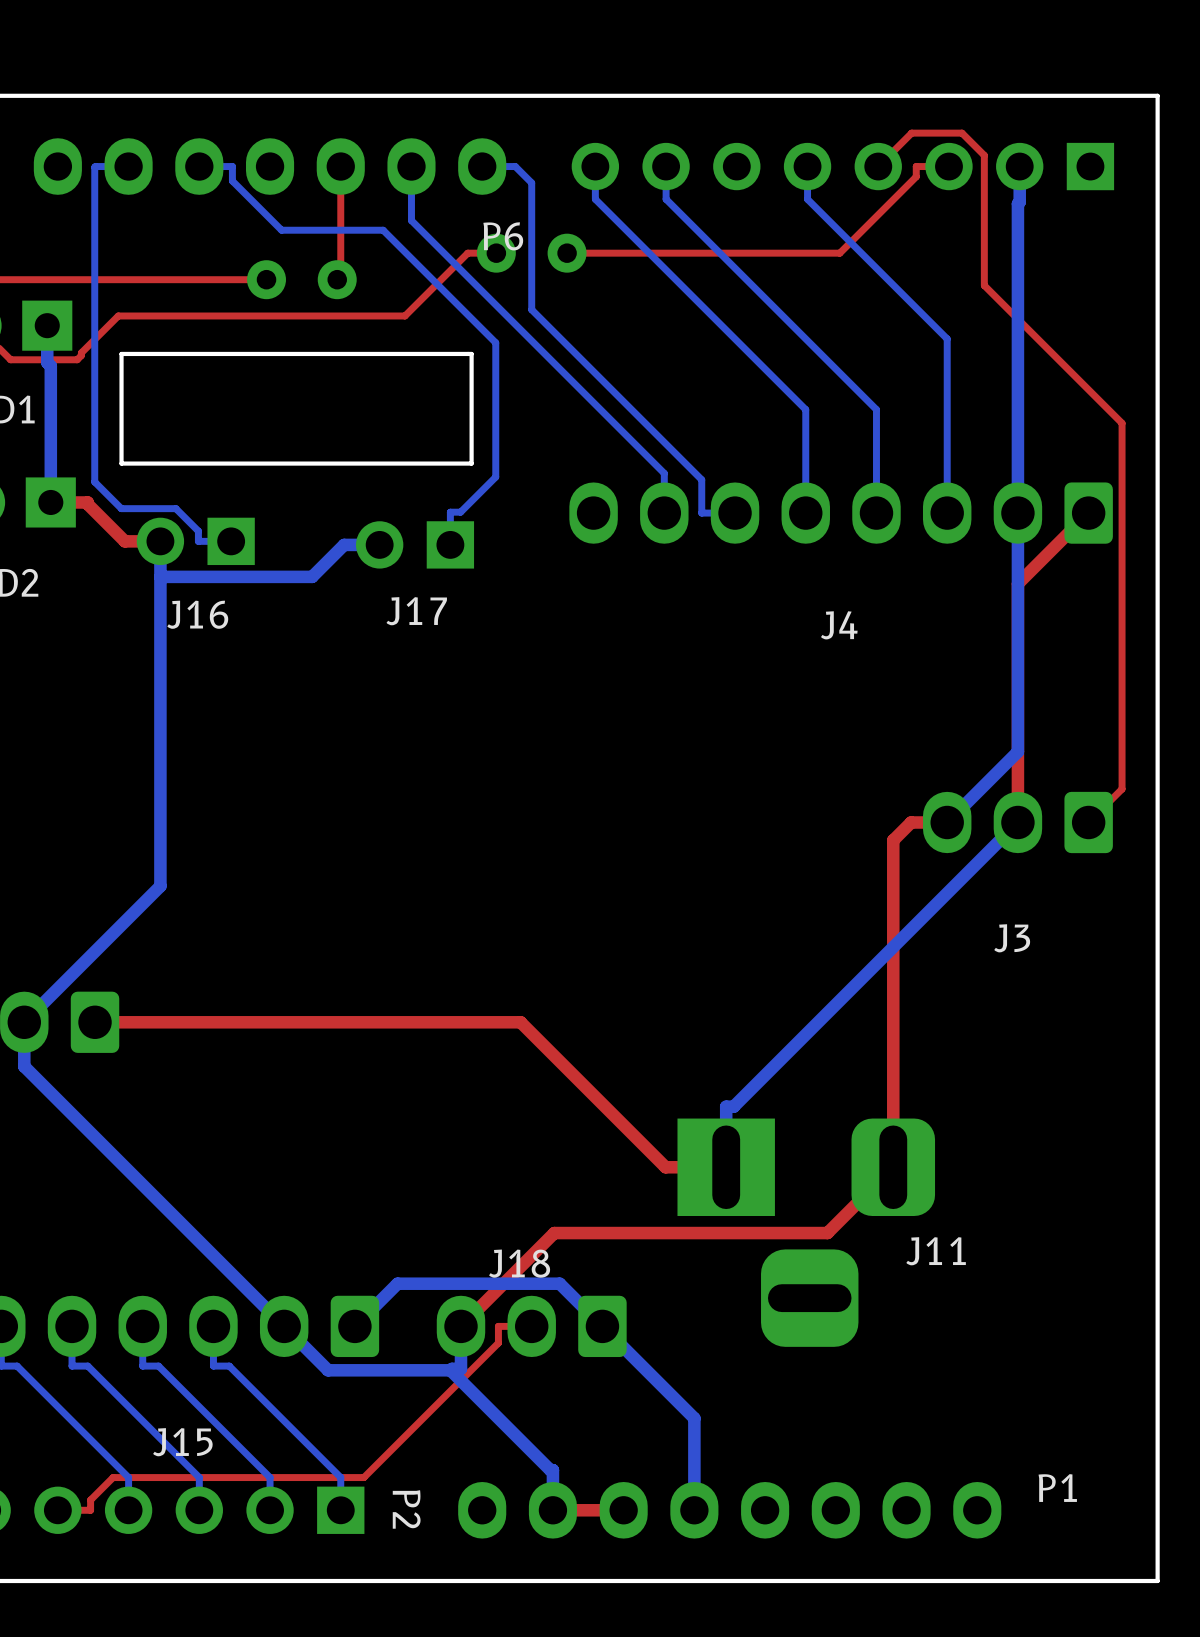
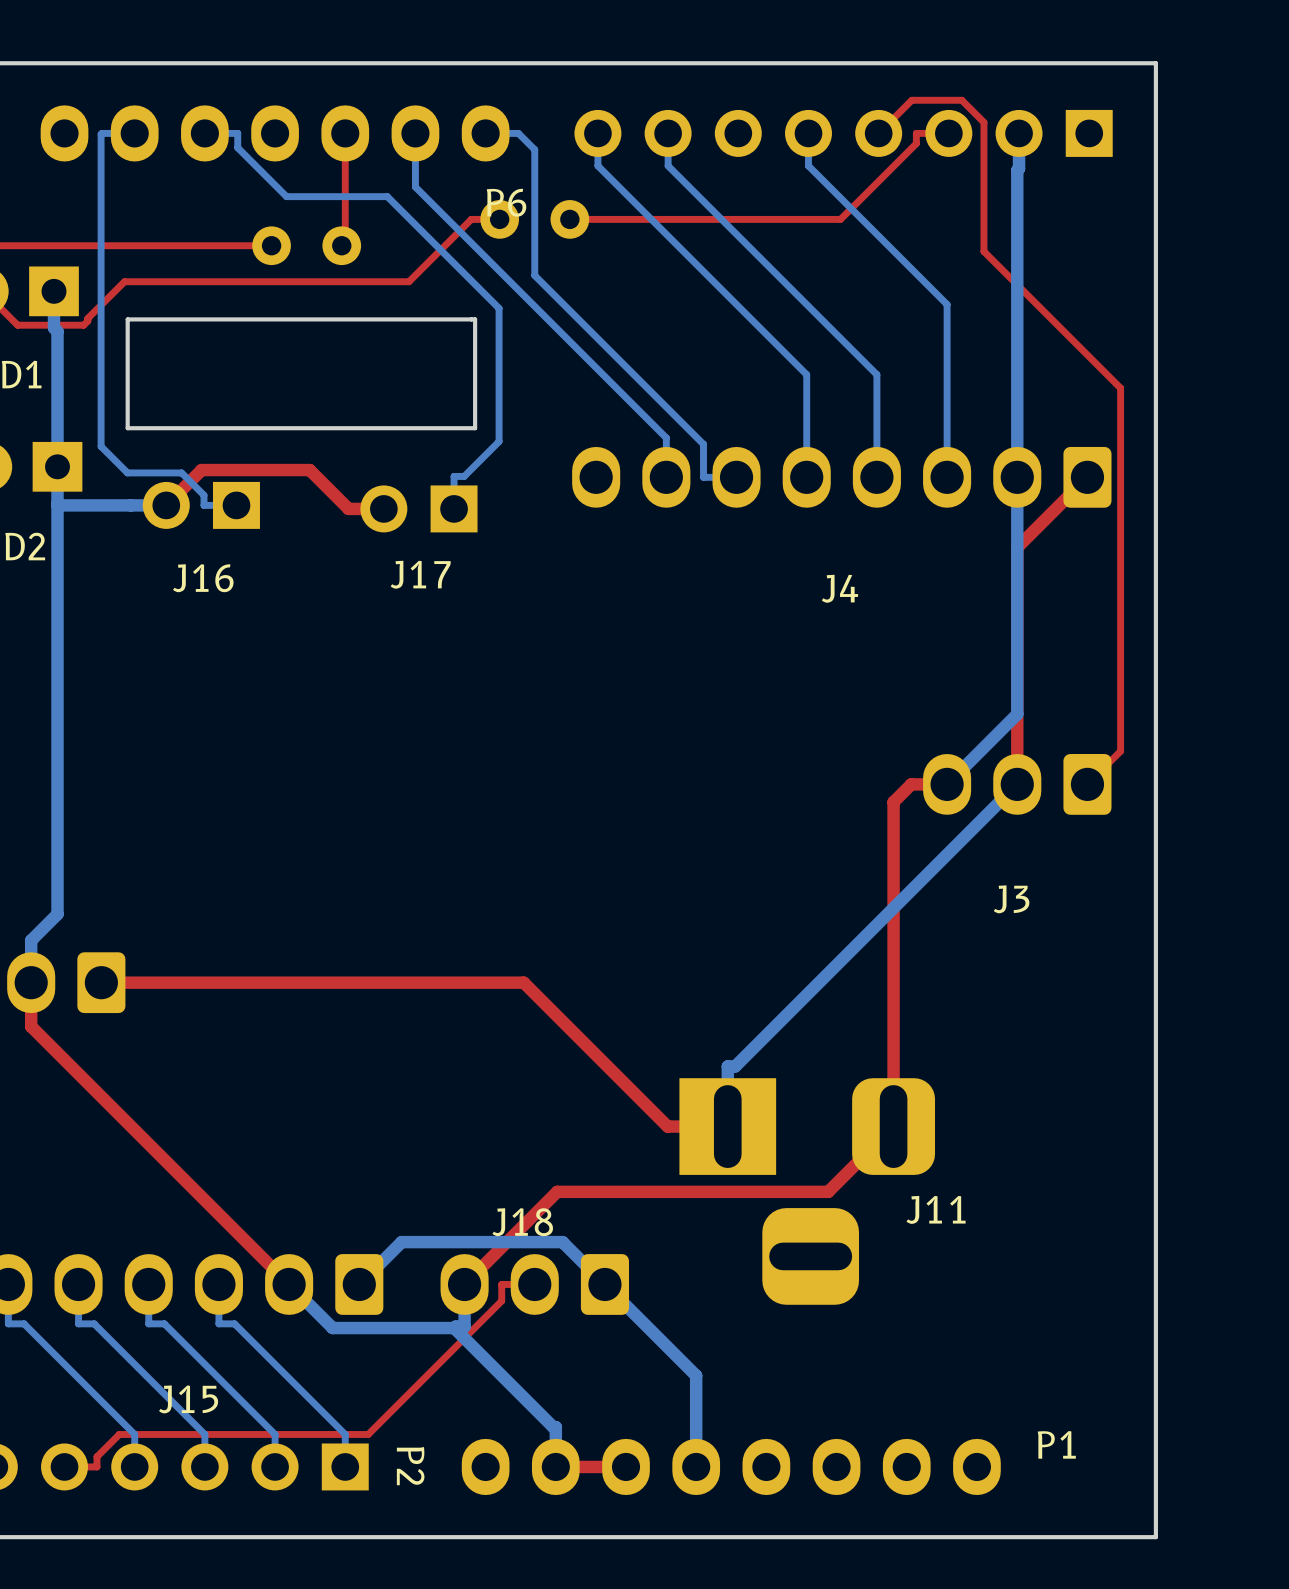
bottom track: none -> (57, 466) (57, 914) (31, 940) (31, 982)
top track: (50, 502) (87, 502) (124, 541) (160, 541) -> (383, 508) (348, 508) (309, 470) (201, 470) (166, 505)
bottom track: (160, 541) (160, 886) (24, 1022) (24, 1066) (284, 1326) -> (166, 505) (57, 505)
bottom track: (379, 544) (344, 544) (312, 576) (160, 576) -> none
top track: none -> (31, 982) (31, 1026) (289, 1284)

